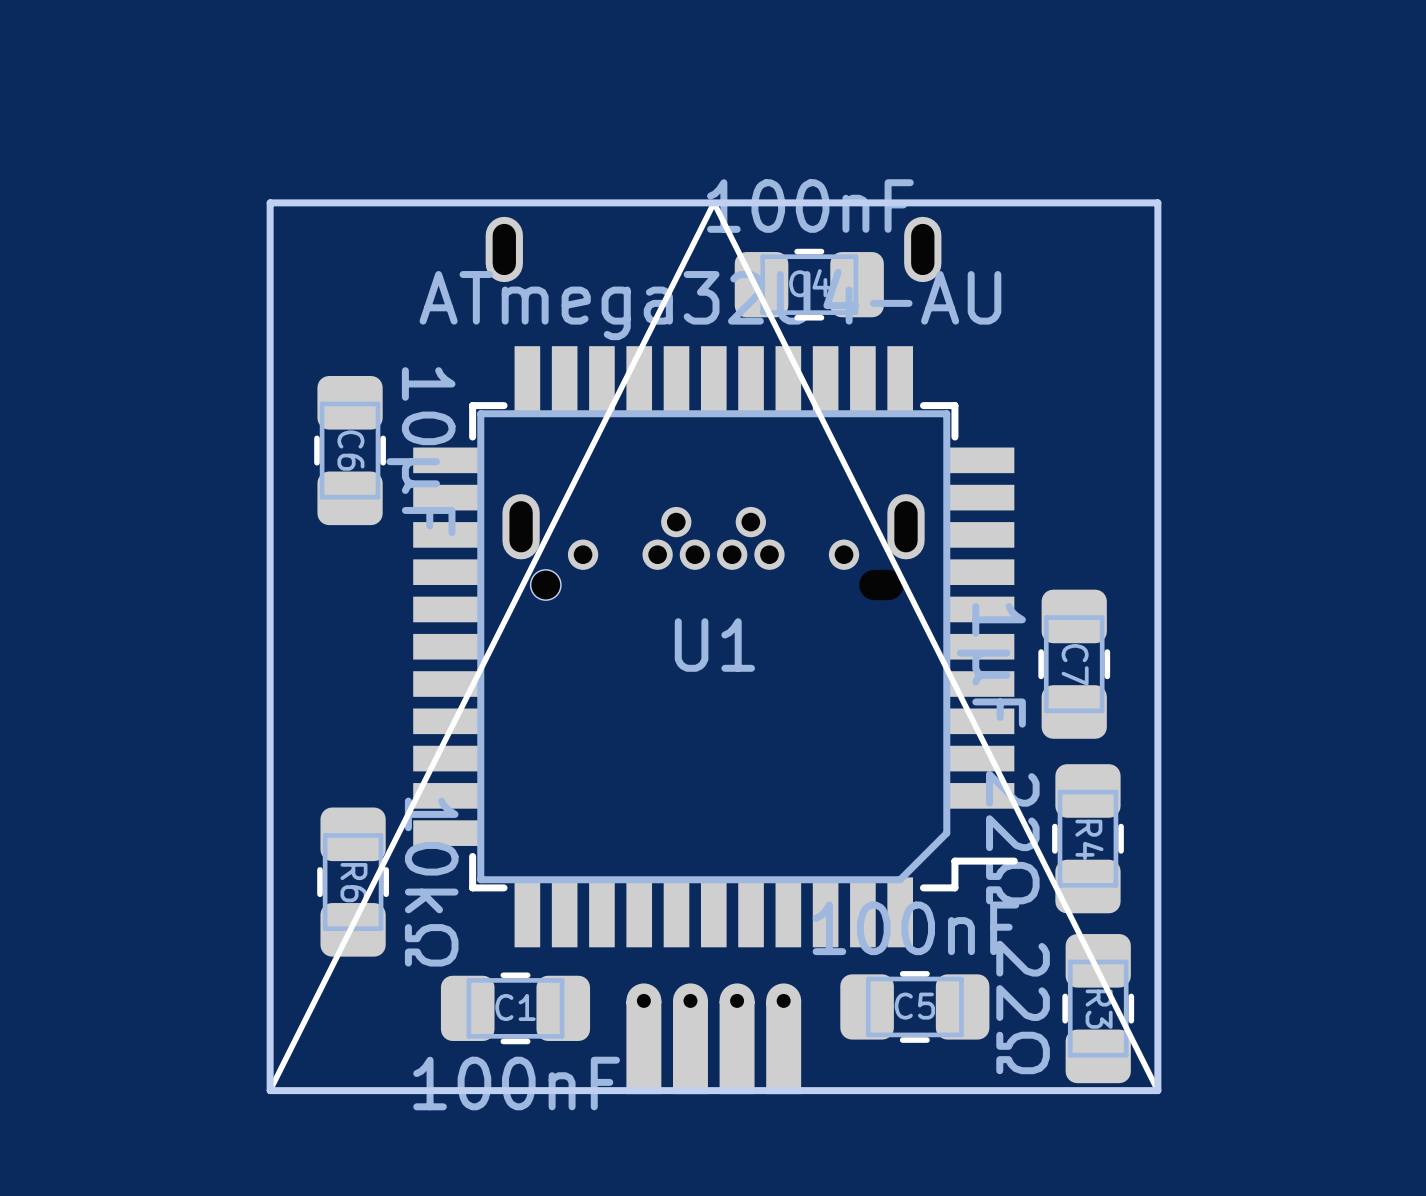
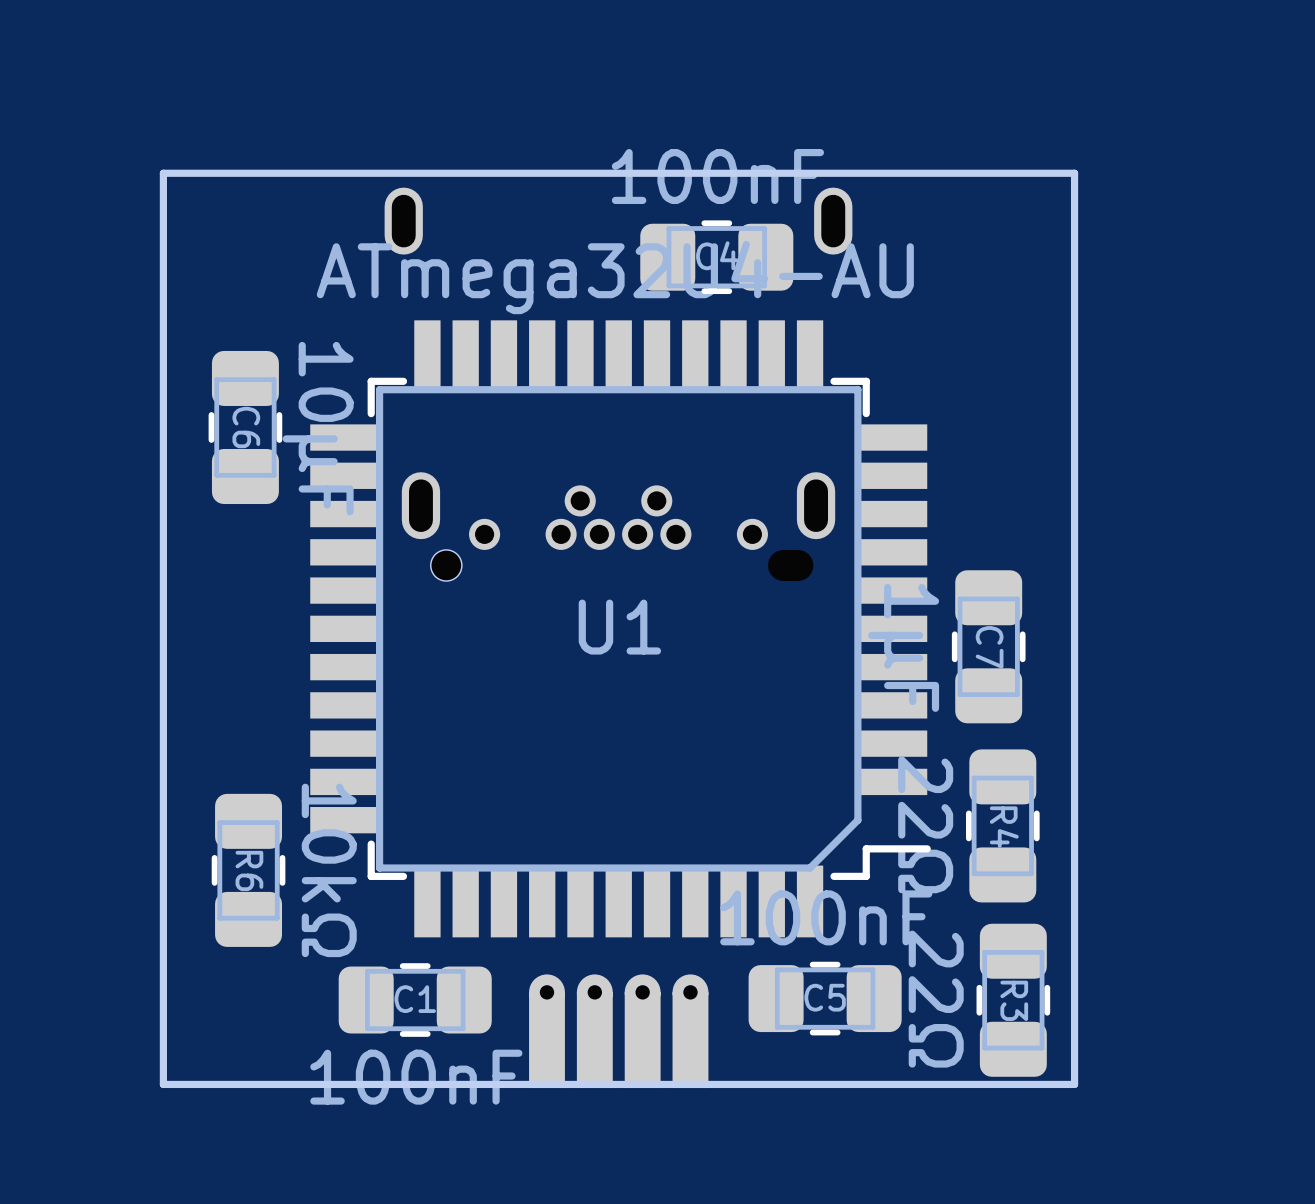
line: (1157, 1090) (714, 202) (269, 1090) -> none

